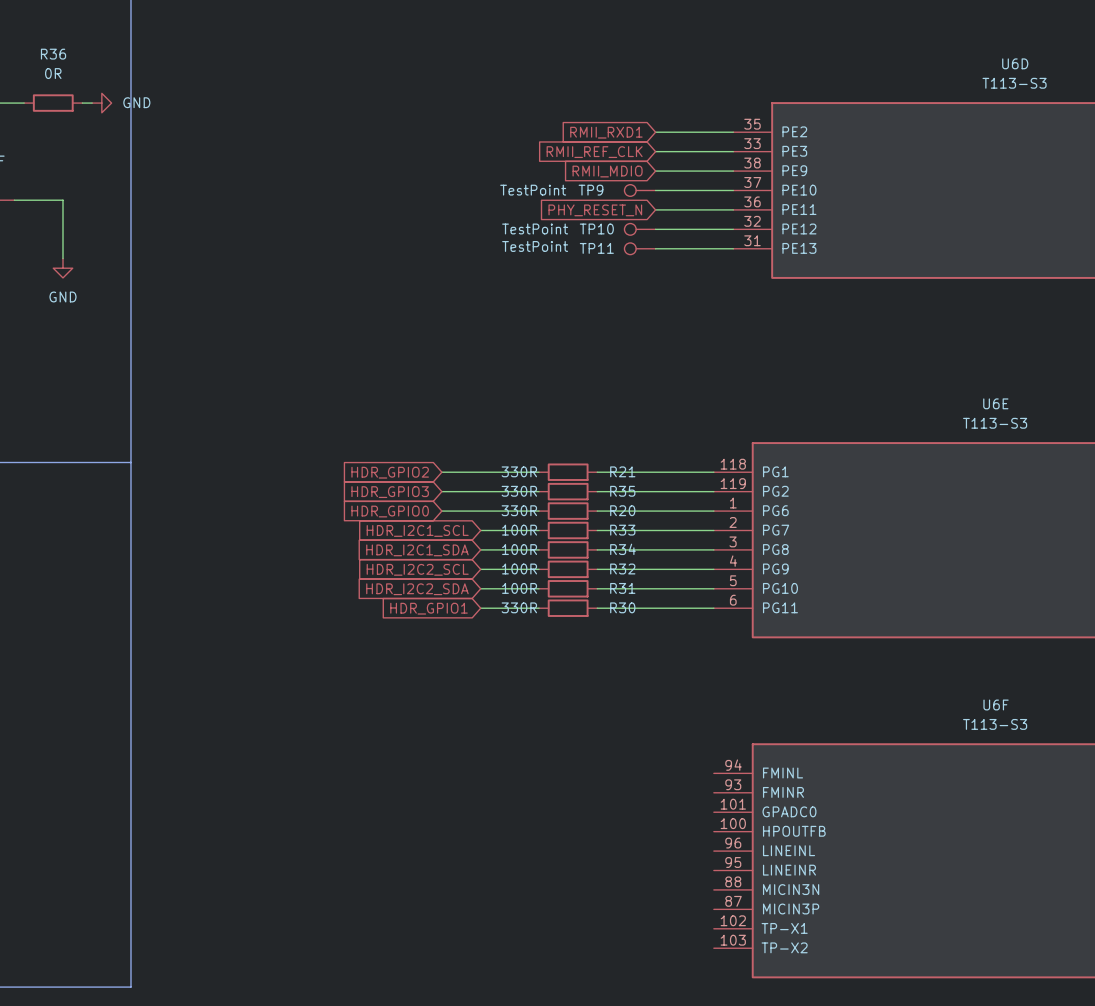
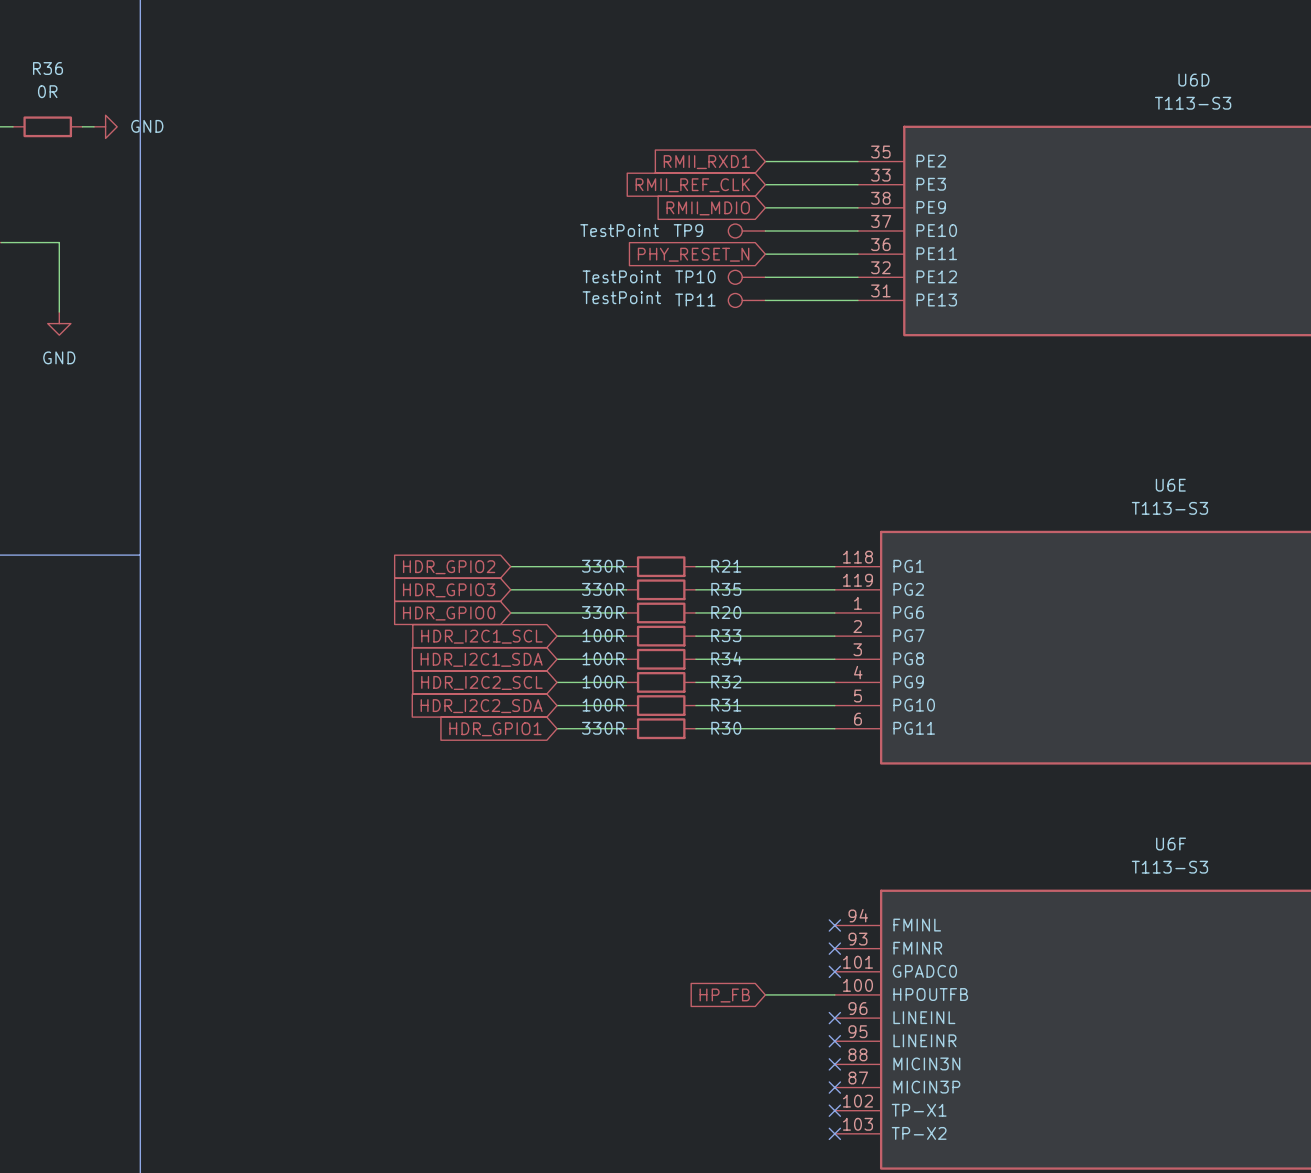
no-connect mark: none -> (834, 925)
no-connect mark: none -> (834, 948)
no-connect mark: none -> (834, 971)
wire: none -> (765, 994) (834, 994)
global label: none -> HP_FB (724, 995)
no-connect mark: none -> (834, 1018)
no-connect mark: none -> (834, 1041)
no-connect mark: none -> (834, 1064)
no-connect mark: none -> (834, 1087)
no-connect mark: none -> (834, 1110)
no-connect mark: none -> (834, 1133)

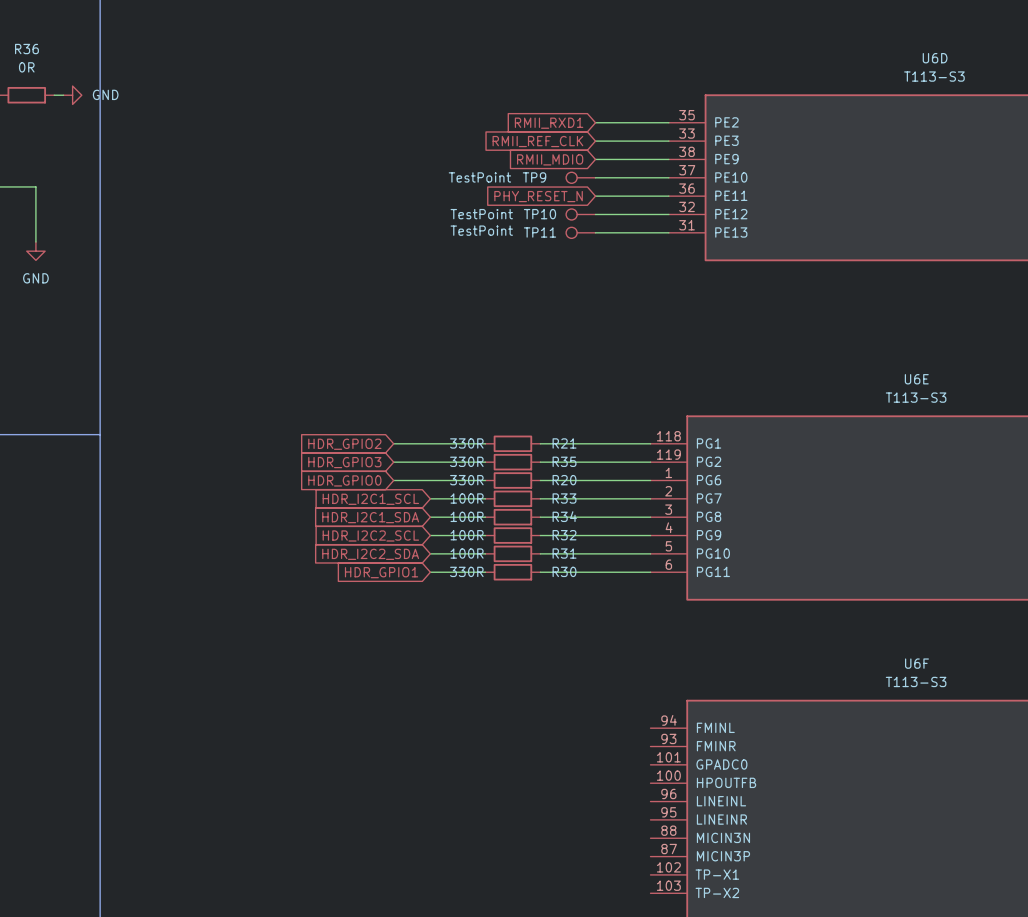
no-connect mark: (834, 925) -> none
no-connect mark: (834, 948) -> none
no-connect mark: (834, 971) -> none
wire: (765, 994) (834, 994) -> none
global label: HP_FB (724, 995) -> none
no-connect mark: (834, 1018) -> none
no-connect mark: (834, 1041) -> none
no-connect mark: (834, 1064) -> none
no-connect mark: (834, 1087) -> none
no-connect mark: (834, 1110) -> none
no-connect mark: (834, 1133) -> none

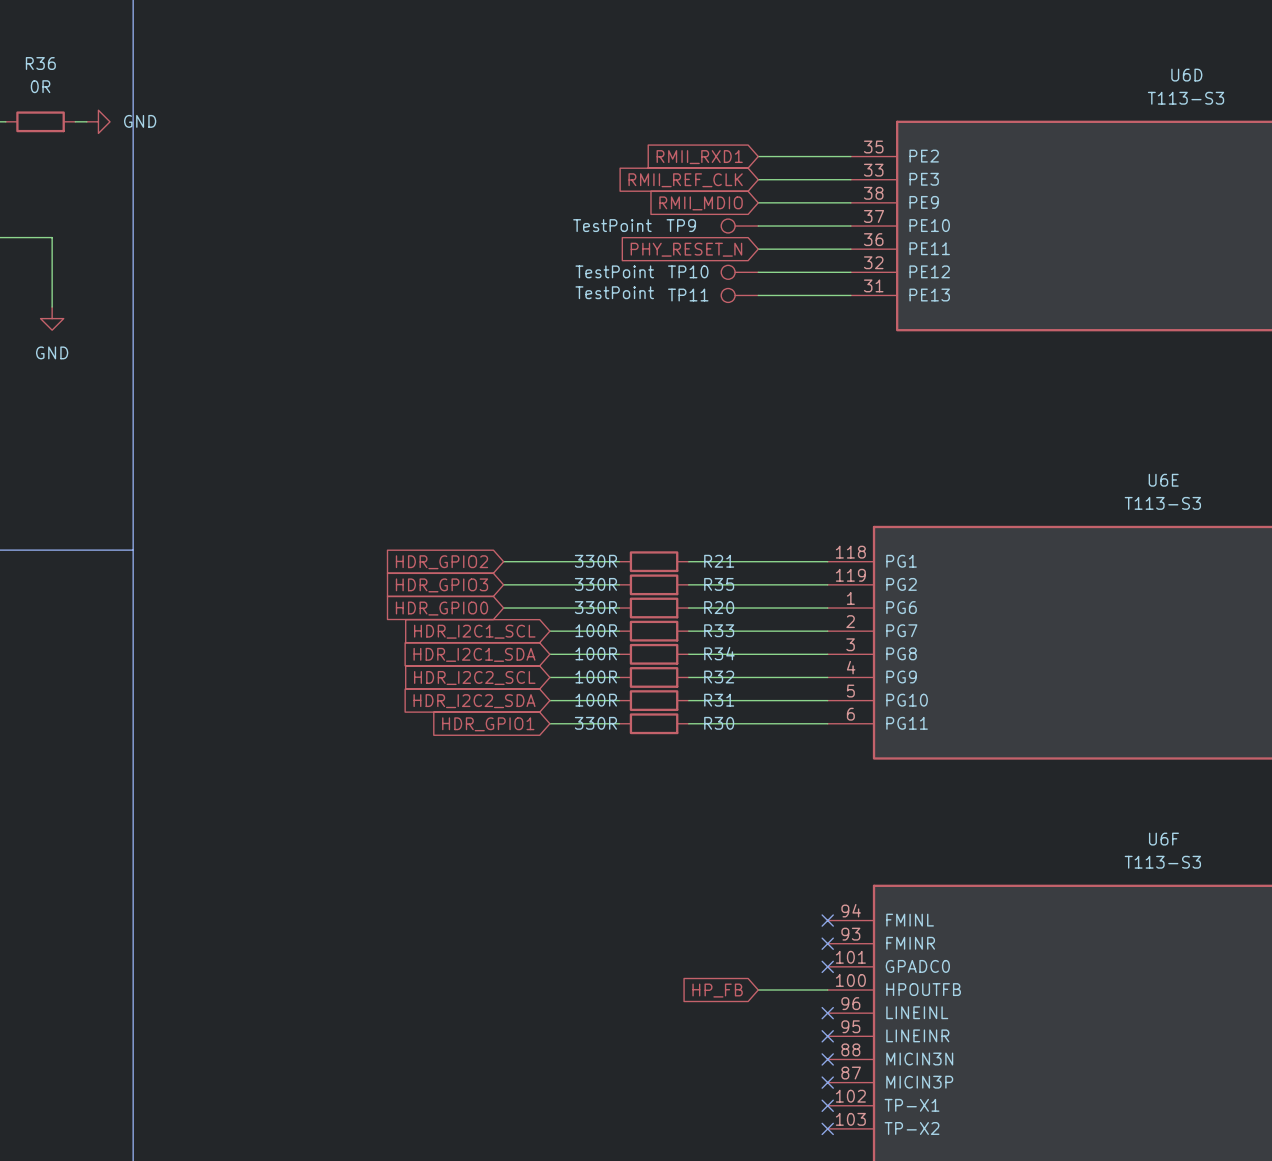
no-connect mark: none -> (827, 920)
no-connect mark: none -> (827, 943)
no-connect mark: none -> (827, 966)
global label: none -> HP_FB (717, 990)
wire: none -> (758, 990) (827, 990)
no-connect mark: none -> (827, 1013)
no-connect mark: none -> (827, 1036)
no-connect mark: none -> (827, 1059)
no-connect mark: none -> (827, 1082)
no-connect mark: none -> (827, 1105)
no-connect mark: none -> (827, 1128)

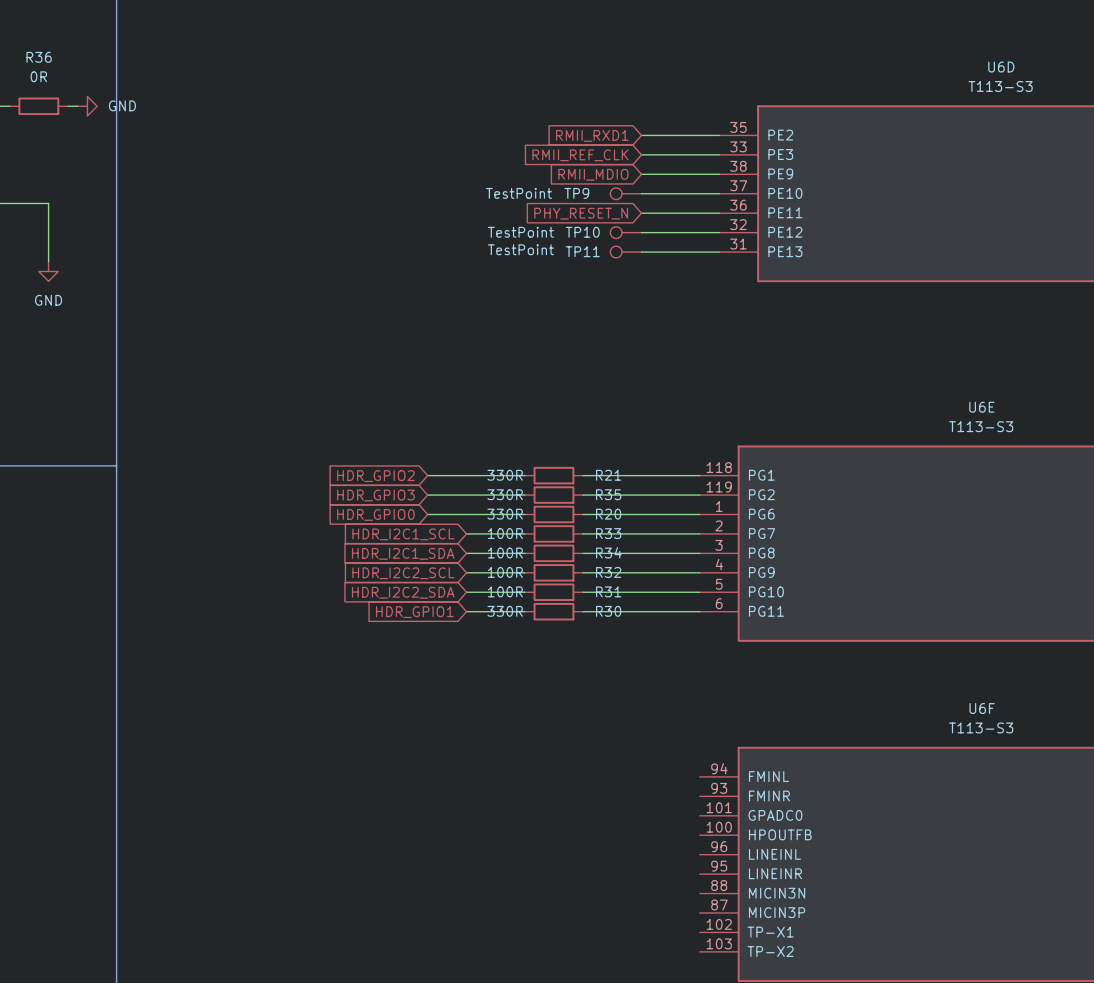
no-connect mark: (827, 920) -> none
no-connect mark: (827, 943) -> none
no-connect mark: (827, 966) -> none
global label: HP_FB (717, 990) -> none
wire: (758, 990) (827, 990) -> none
no-connect mark: (827, 1013) -> none
no-connect mark: (827, 1036) -> none
no-connect mark: (827, 1059) -> none
no-connect mark: (827, 1082) -> none
no-connect mark: (827, 1105) -> none
no-connect mark: (827, 1128) -> none

